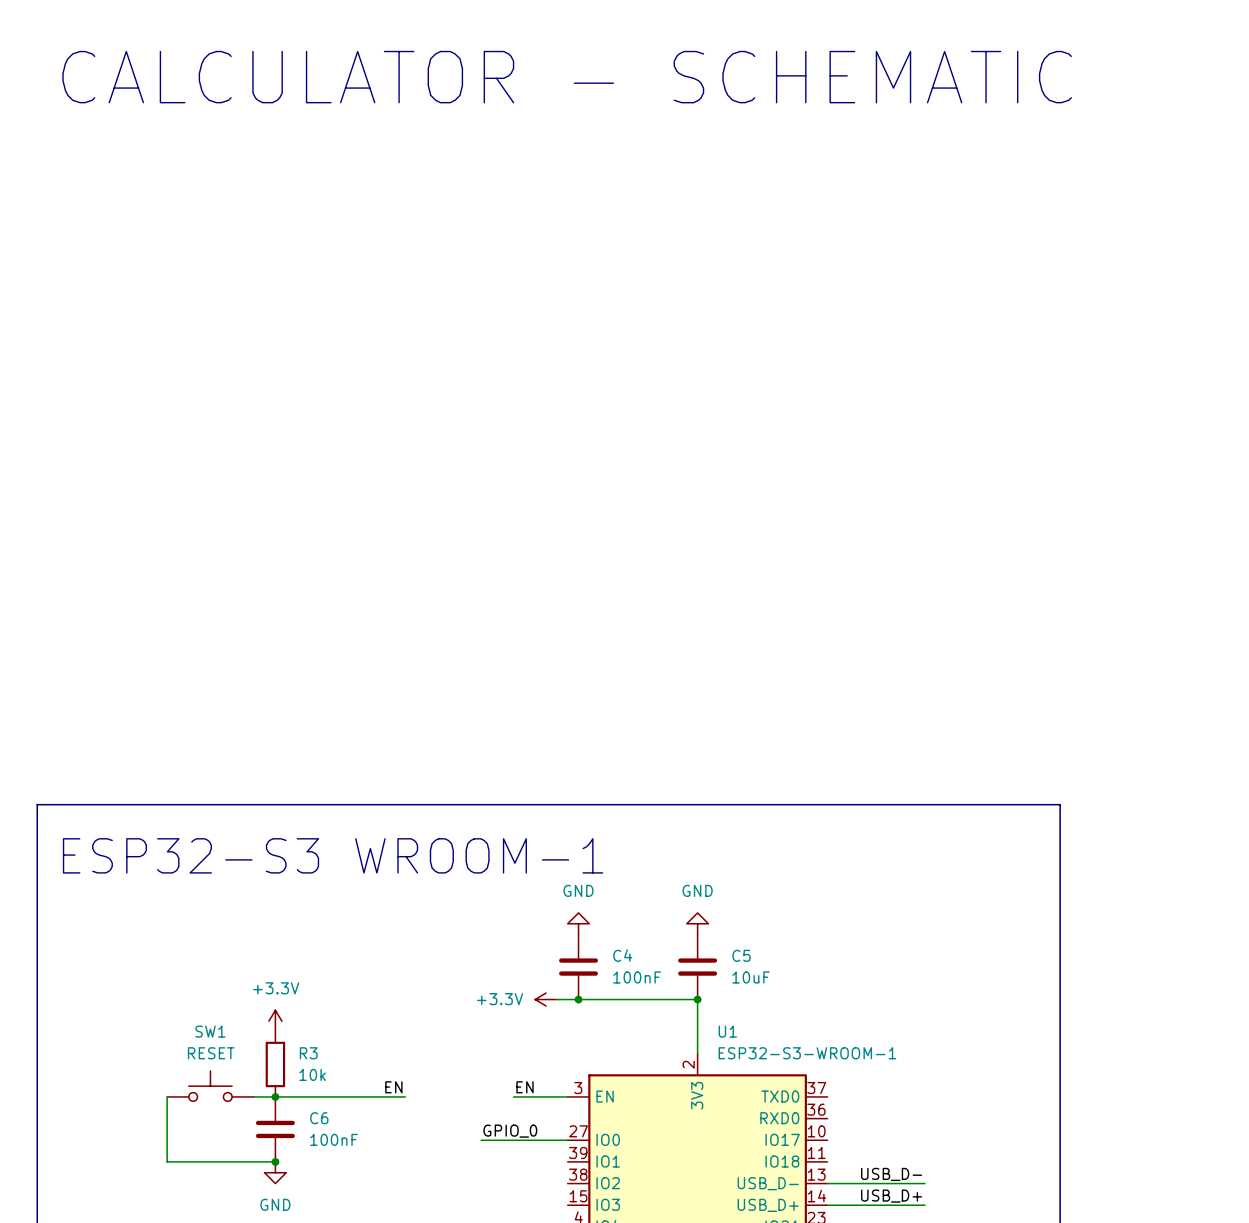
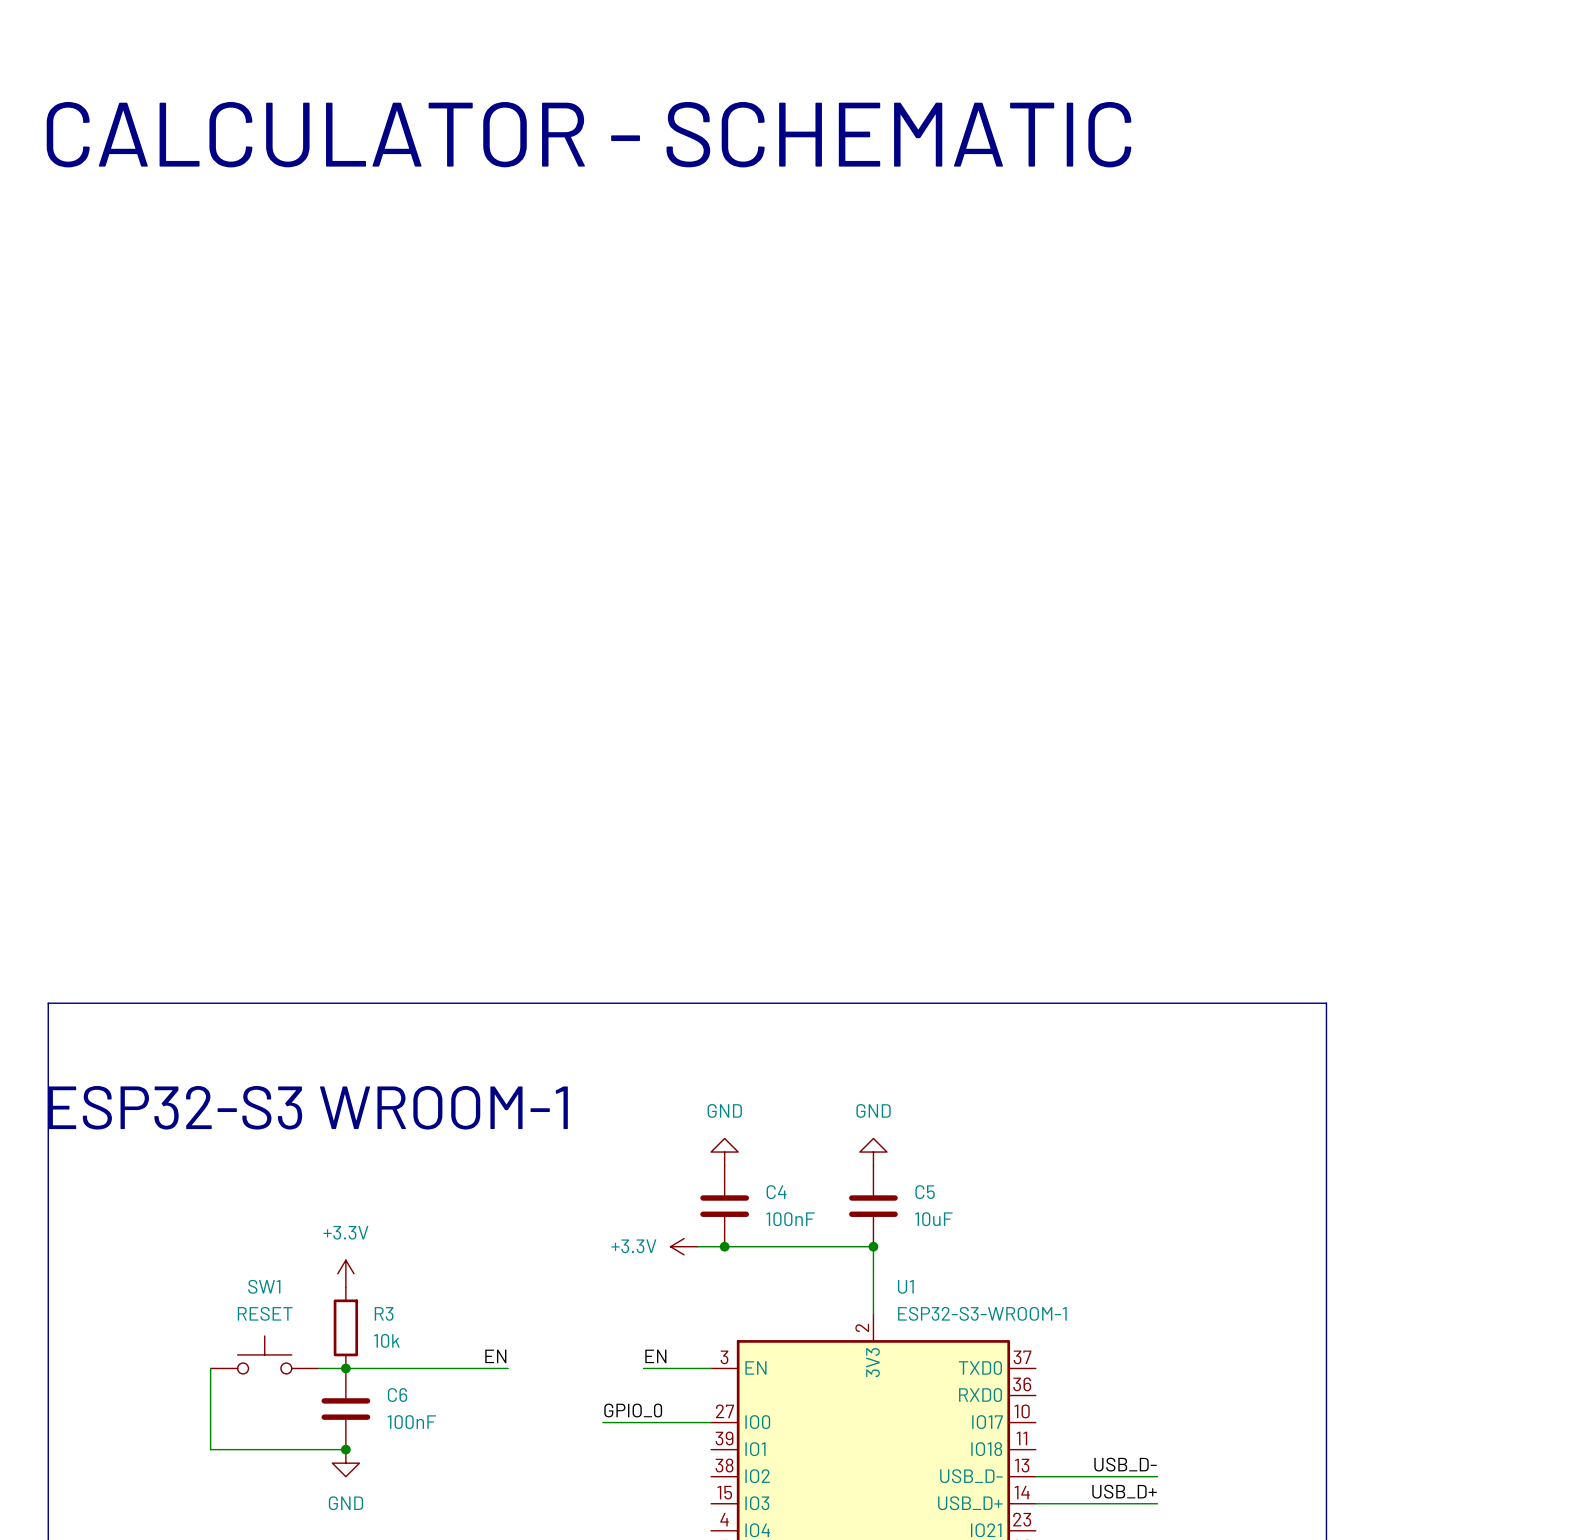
text position: CALCULATOR - SCHEMATIC (567, 77) -> CALCULATOR - SCHEMATIC (589, 134)
text position: ESP32-S3 WROOM-1 (333, 855) -> ESP32-S3 WROOM-1 (308, 1107)

